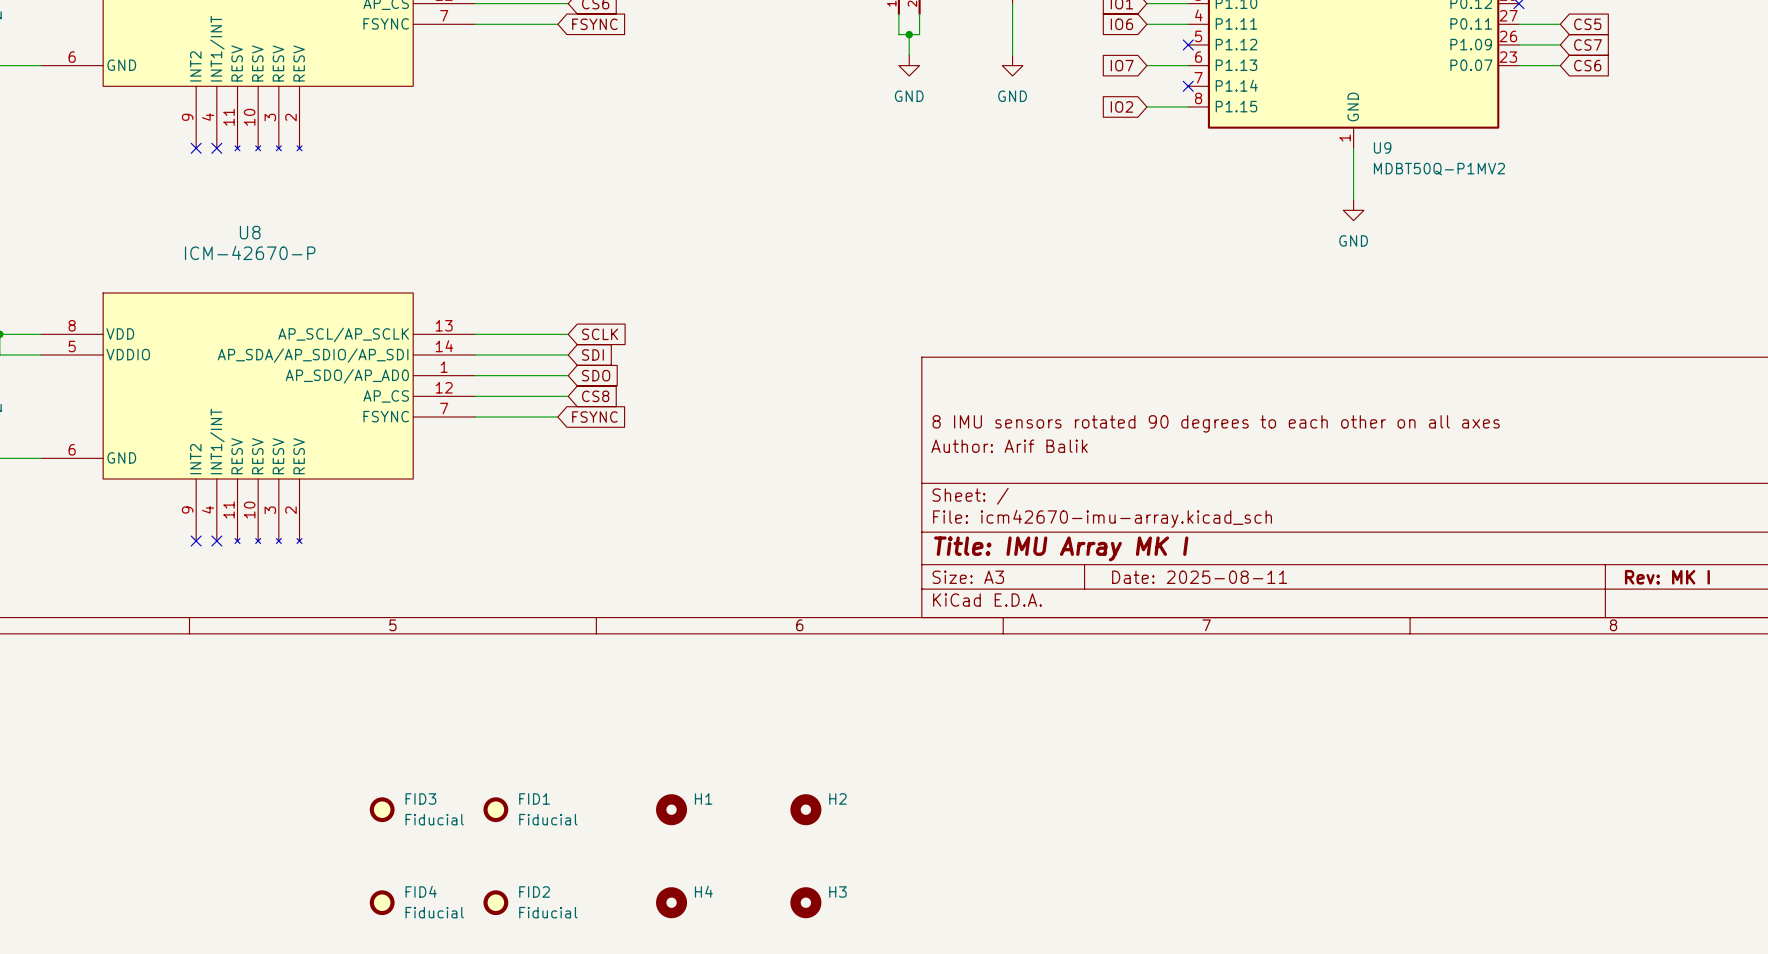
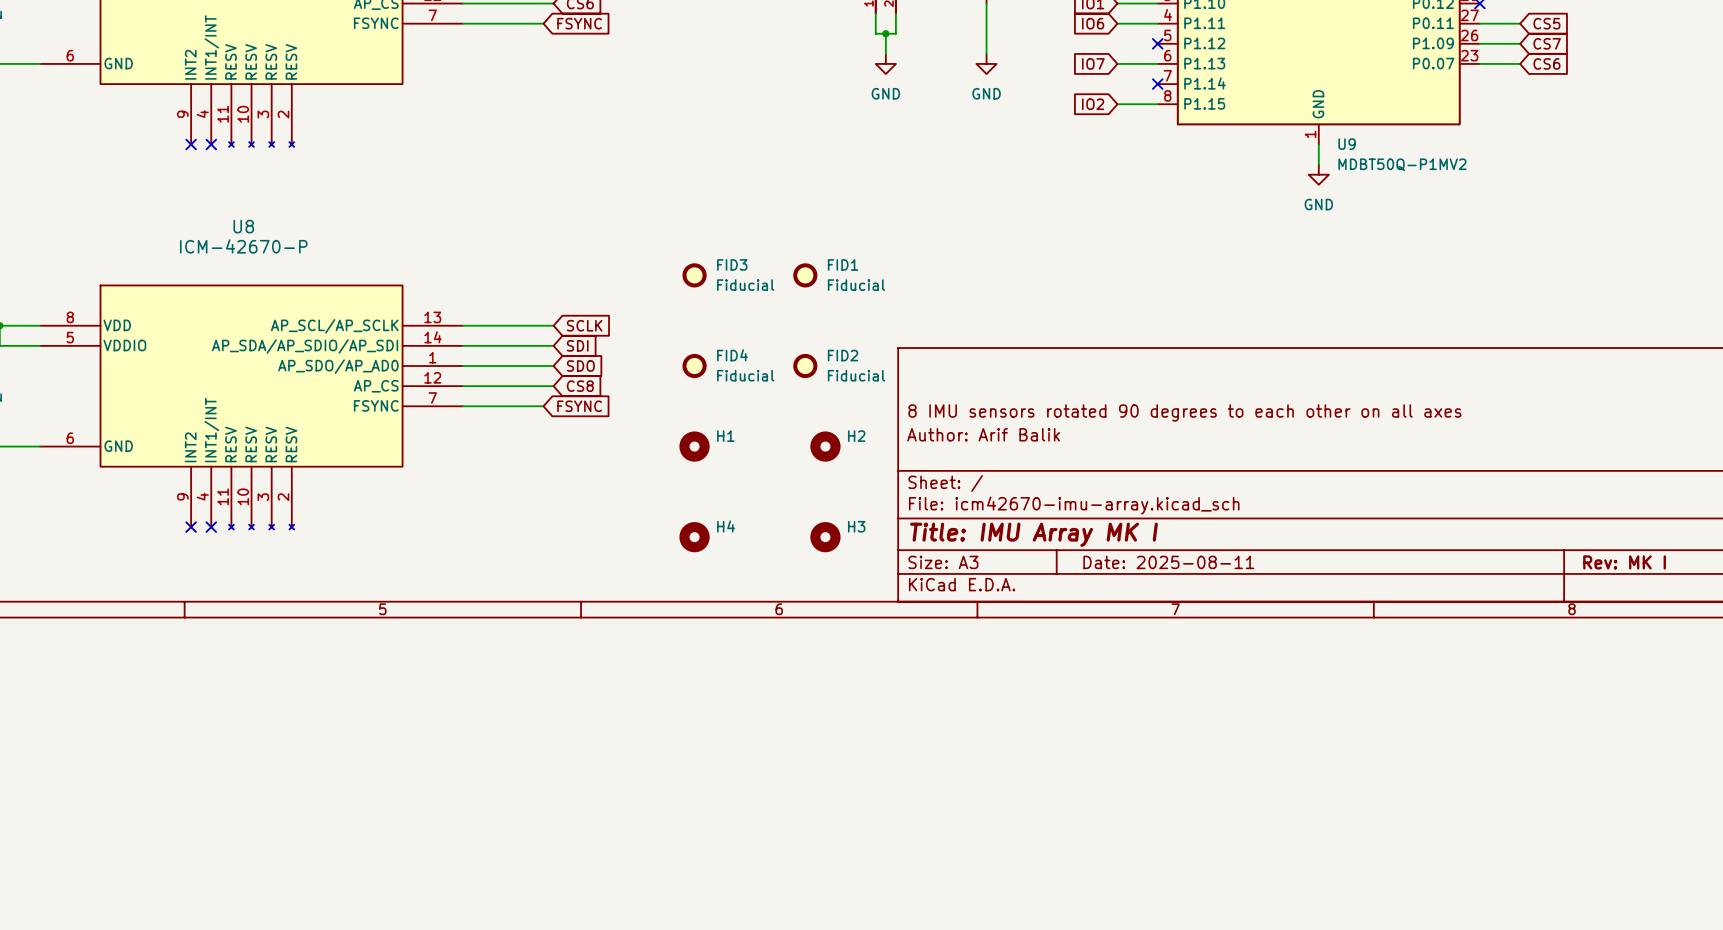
wire: (1353, 168) (1353, 199) -> none
power symbol position: GND (1353, 210) -> GND (1318, 174)
FID3 position: (382, 809) -> (694, 275)
FID1 position: (495, 809) -> (805, 275)
H1 position: (671, 809) -> (694, 446)
H2 position: (805, 809) -> (825, 446)
FID4 position: (382, 902) -> (694, 366)
FID2 position: (495, 902) -> (805, 366)
H4 position: (671, 902) -> (694, 537)
H3 position: (805, 902) -> (825, 537)

